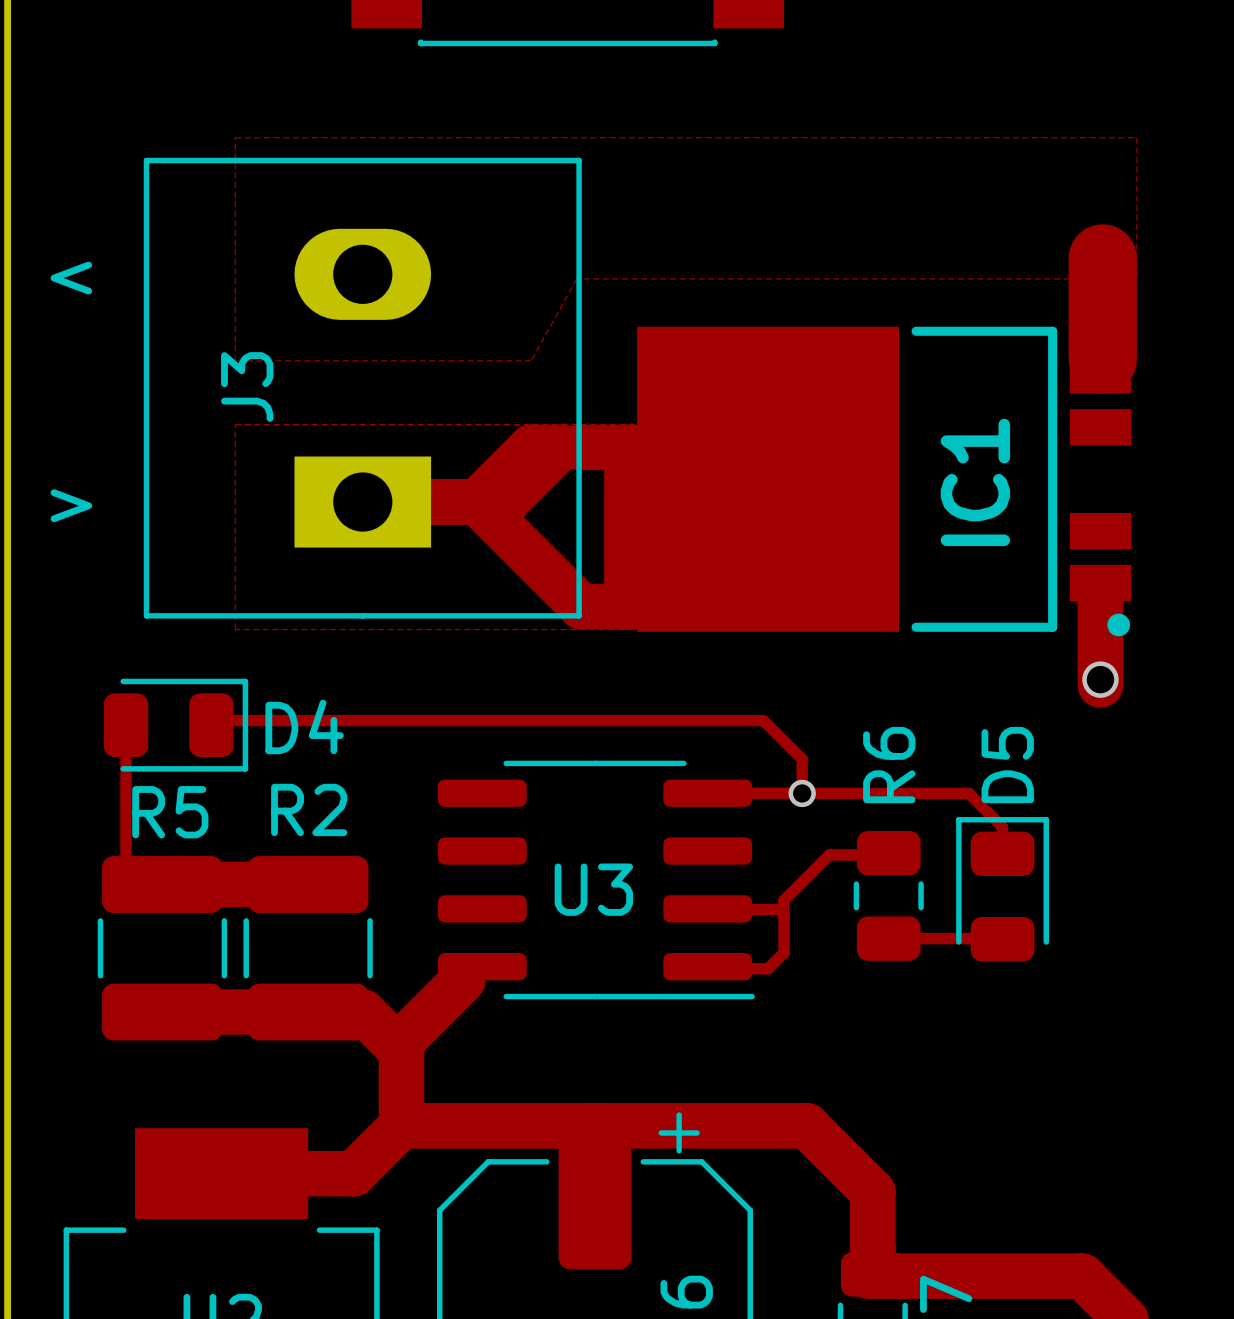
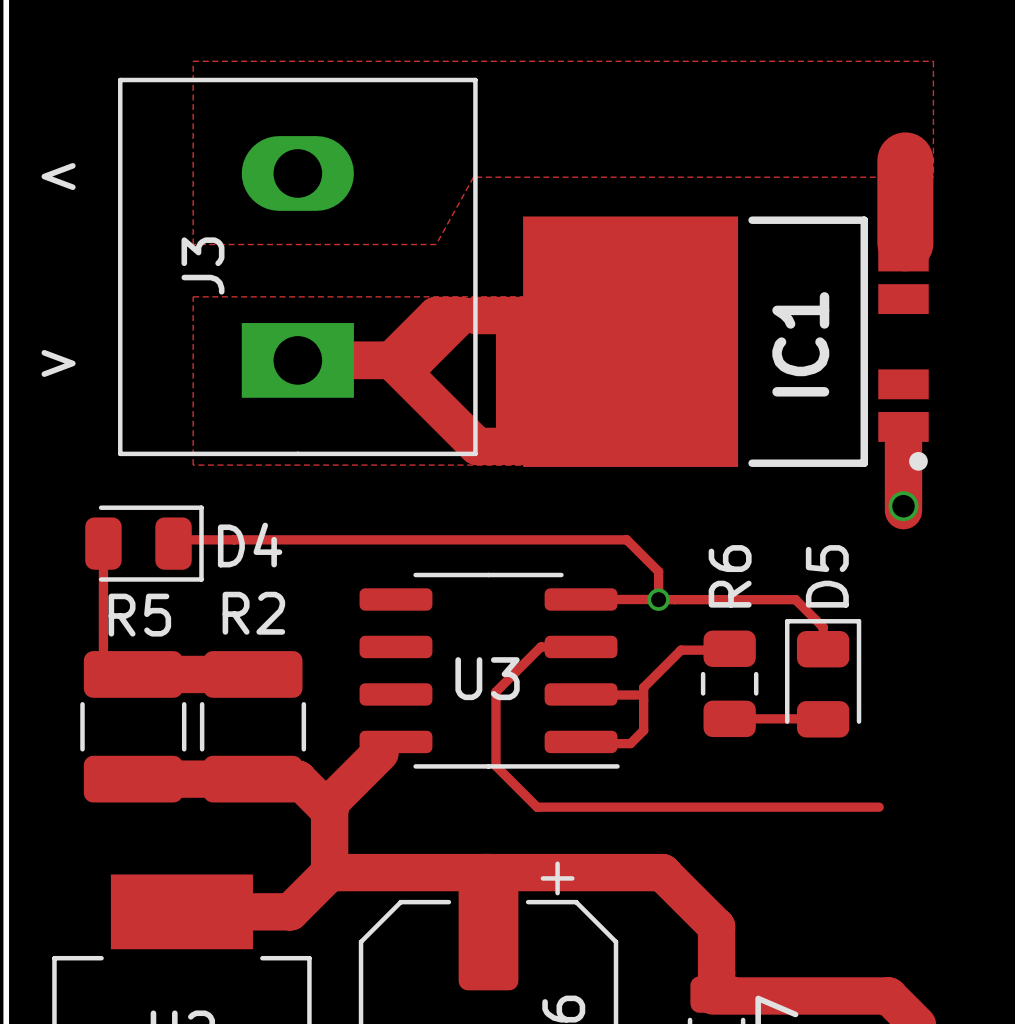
track: none -> (581, 646) (540, 646) (495, 691) (495, 766) (537, 807) (879, 807)

